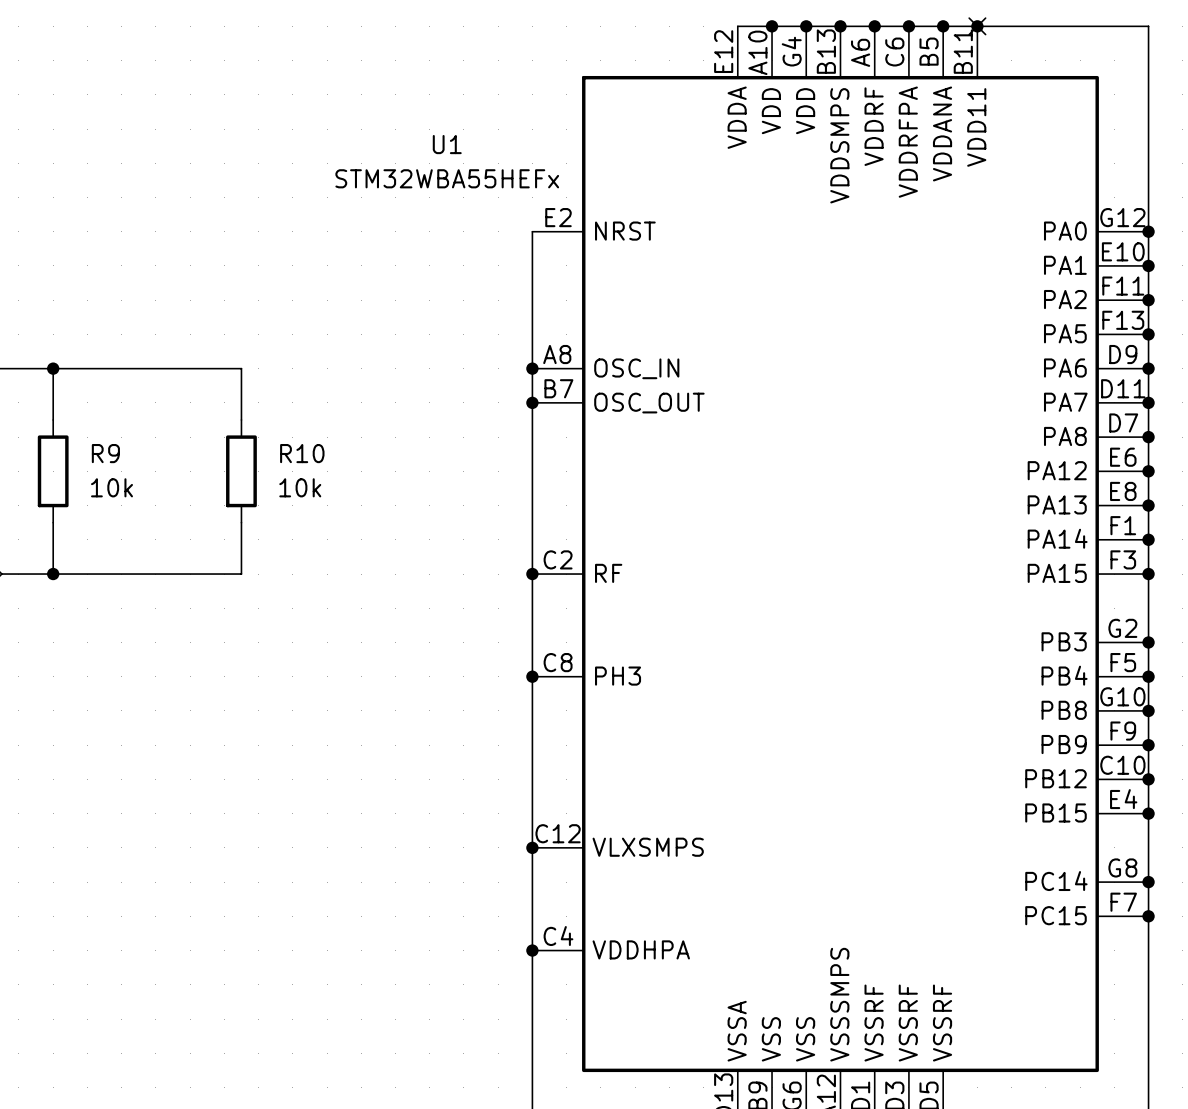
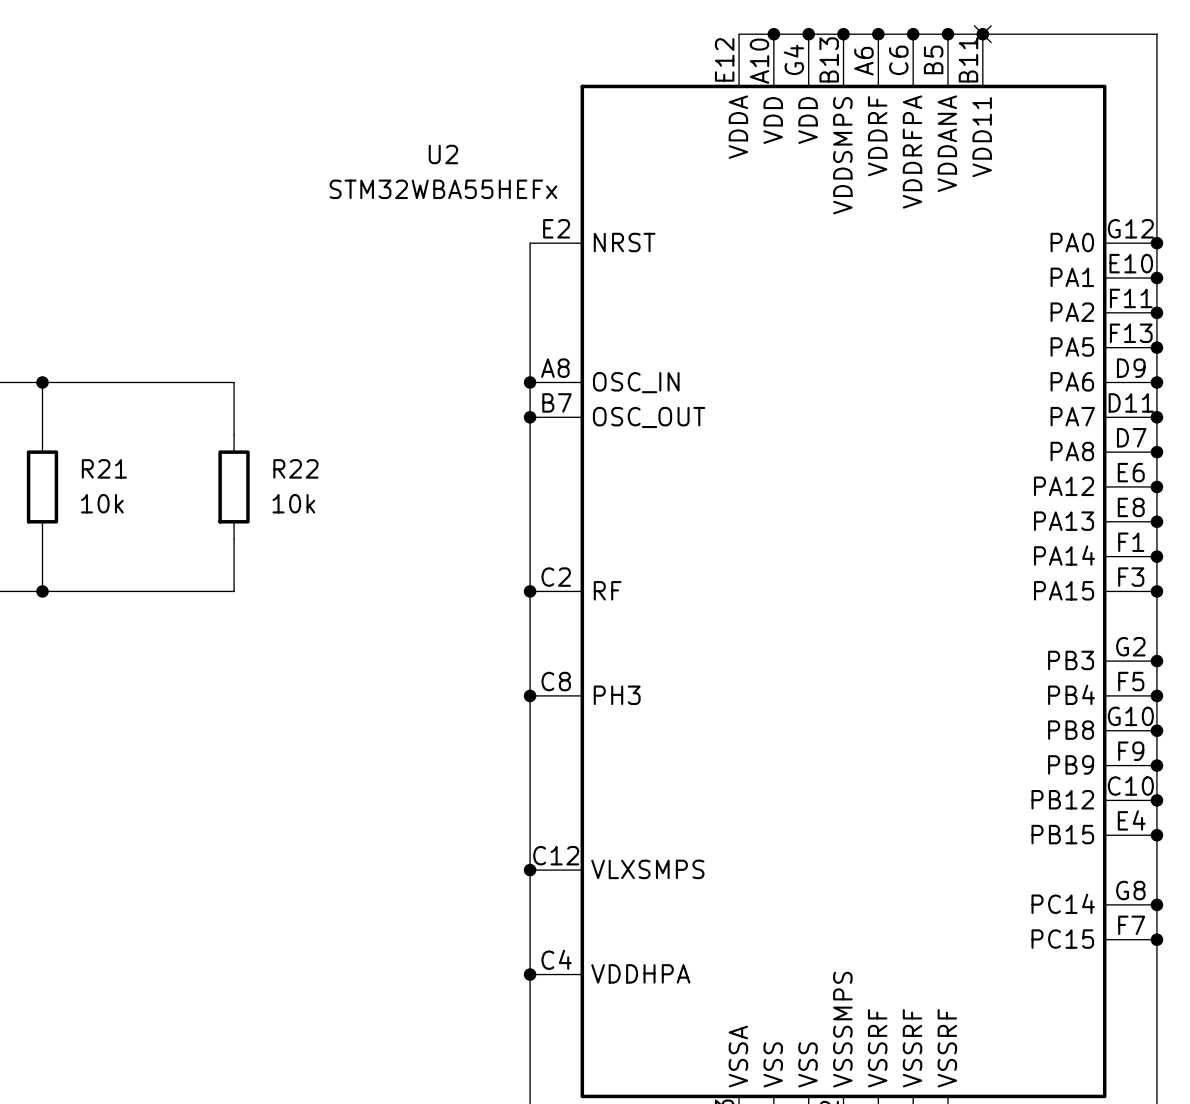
U1 name: U1 (447, 144) -> U2 (443, 154)
R9 name: R9 (105, 453) -> R21 (104, 468)
R10 name: R10 (302, 453) -> R22 (295, 468)

